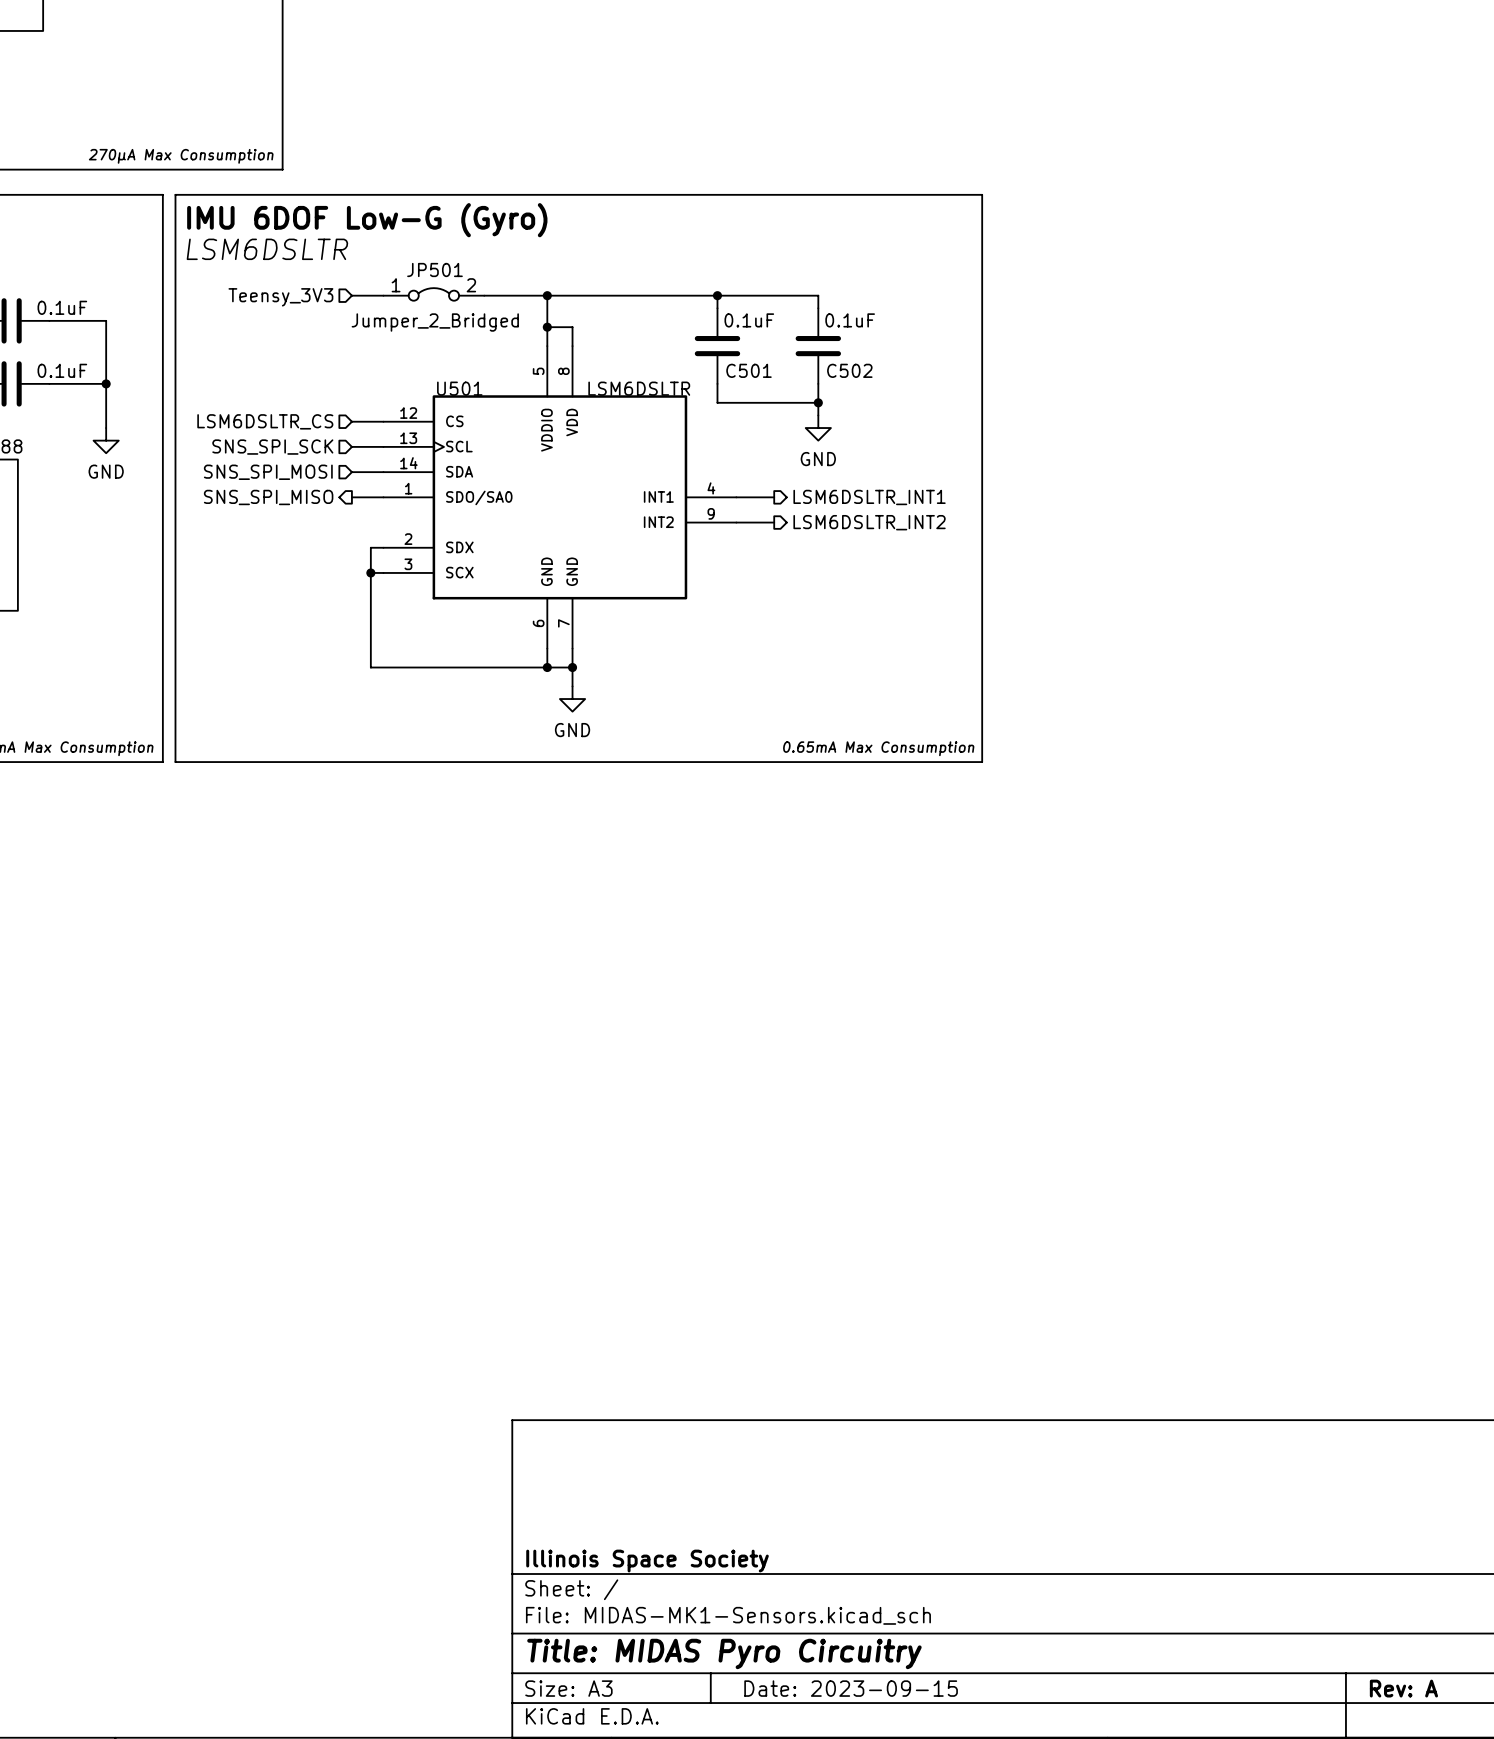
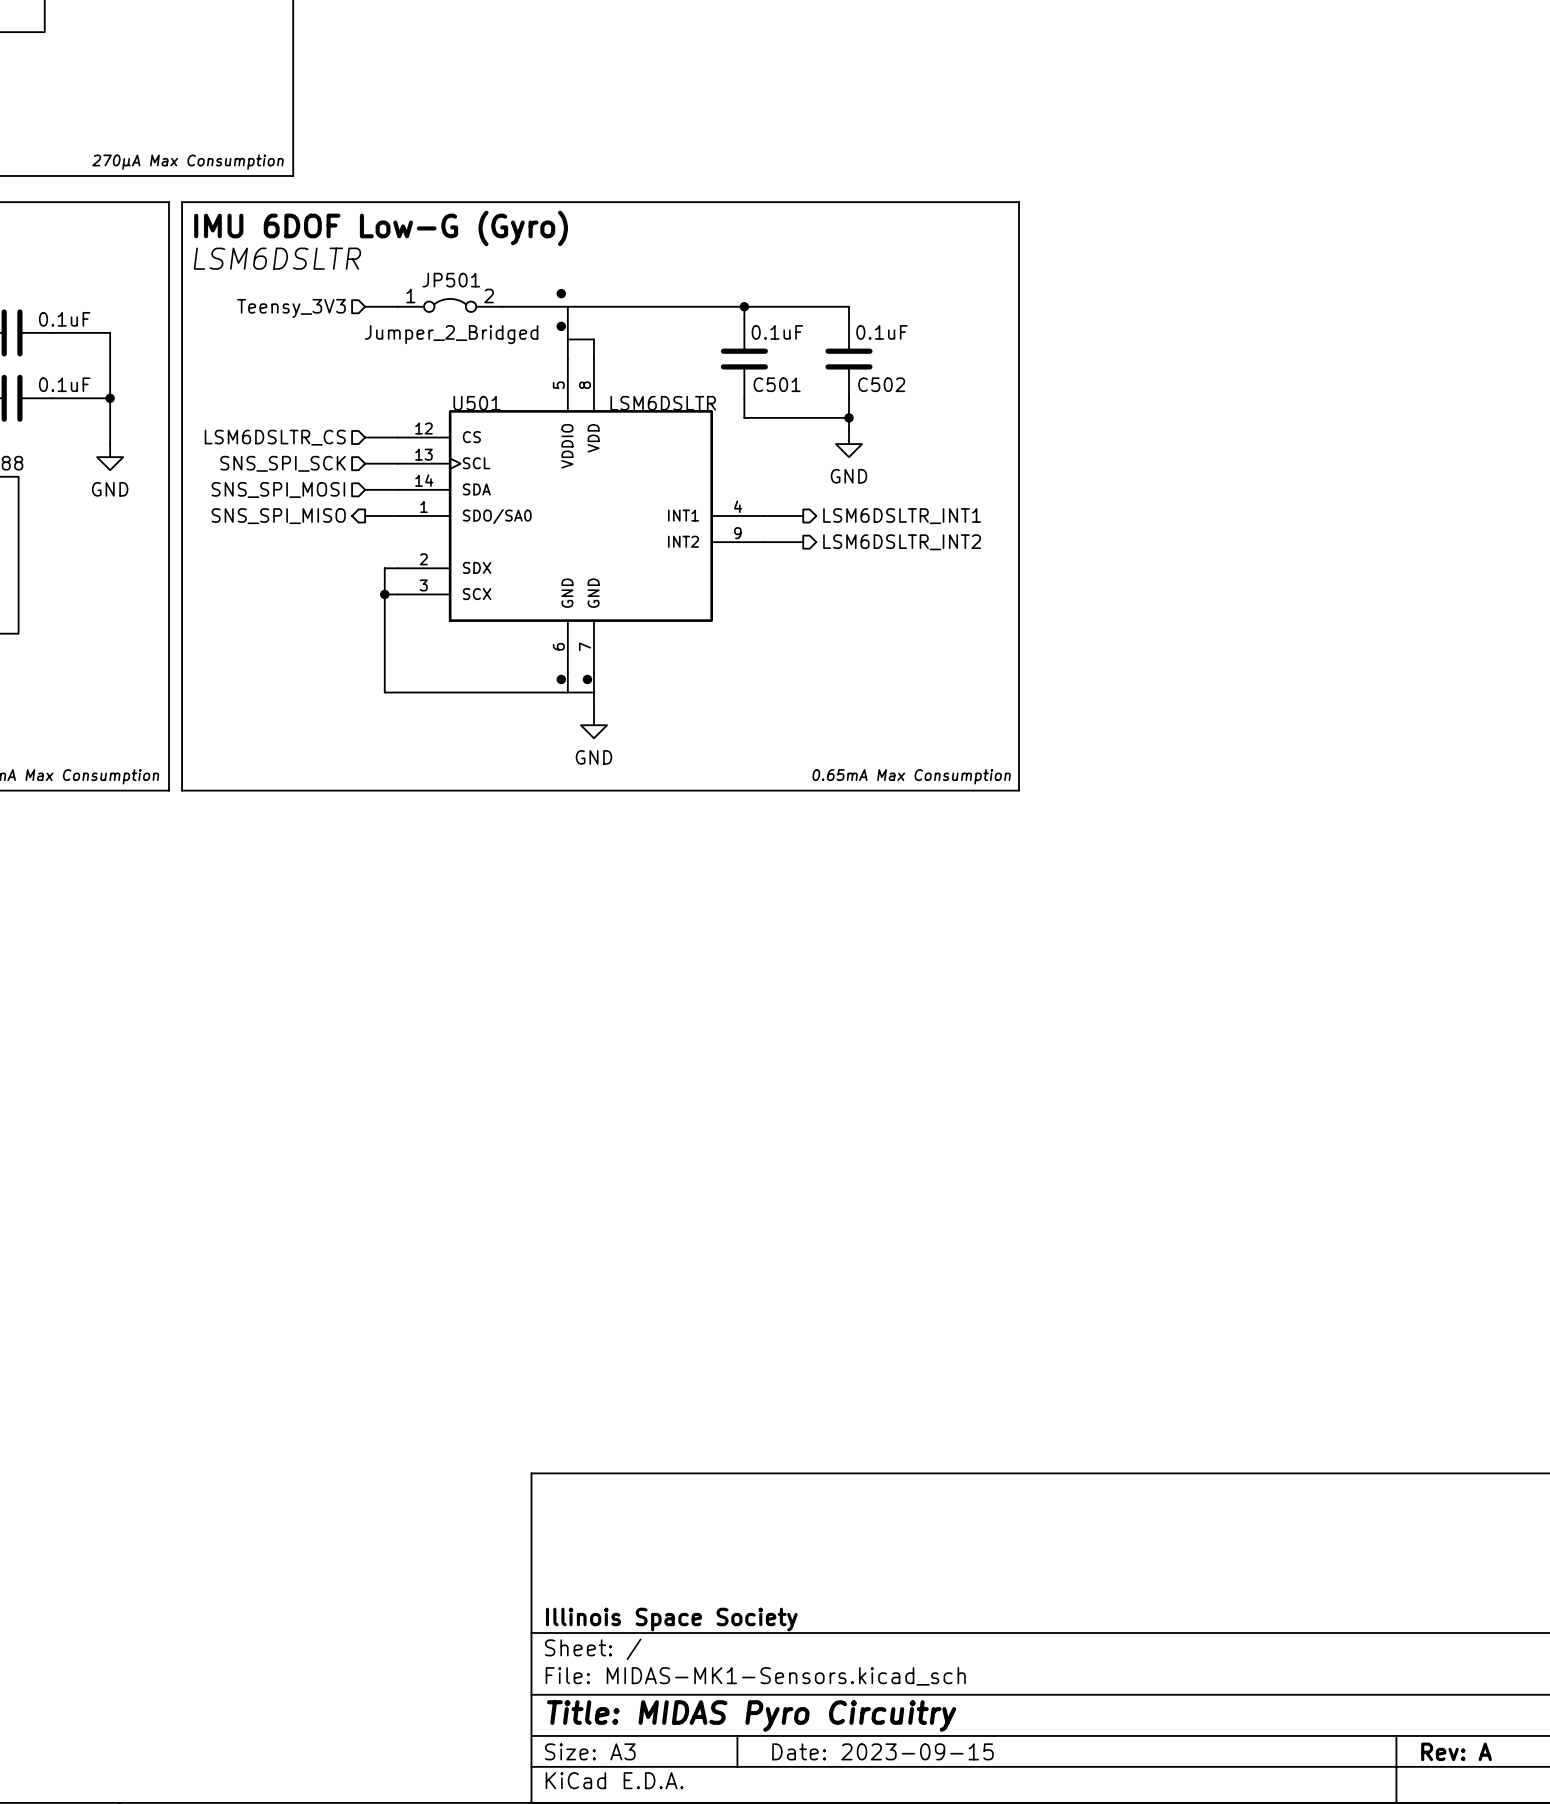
junction: none -> (561, 293)
junction: (547, 295) -> none
junction: none -> (561, 326)
junction: (547, 327) -> none
junction: none -> (561, 679)
junction: none -> (587, 679)
junction: (547, 667) -> none
junction: (572, 667) -> none

